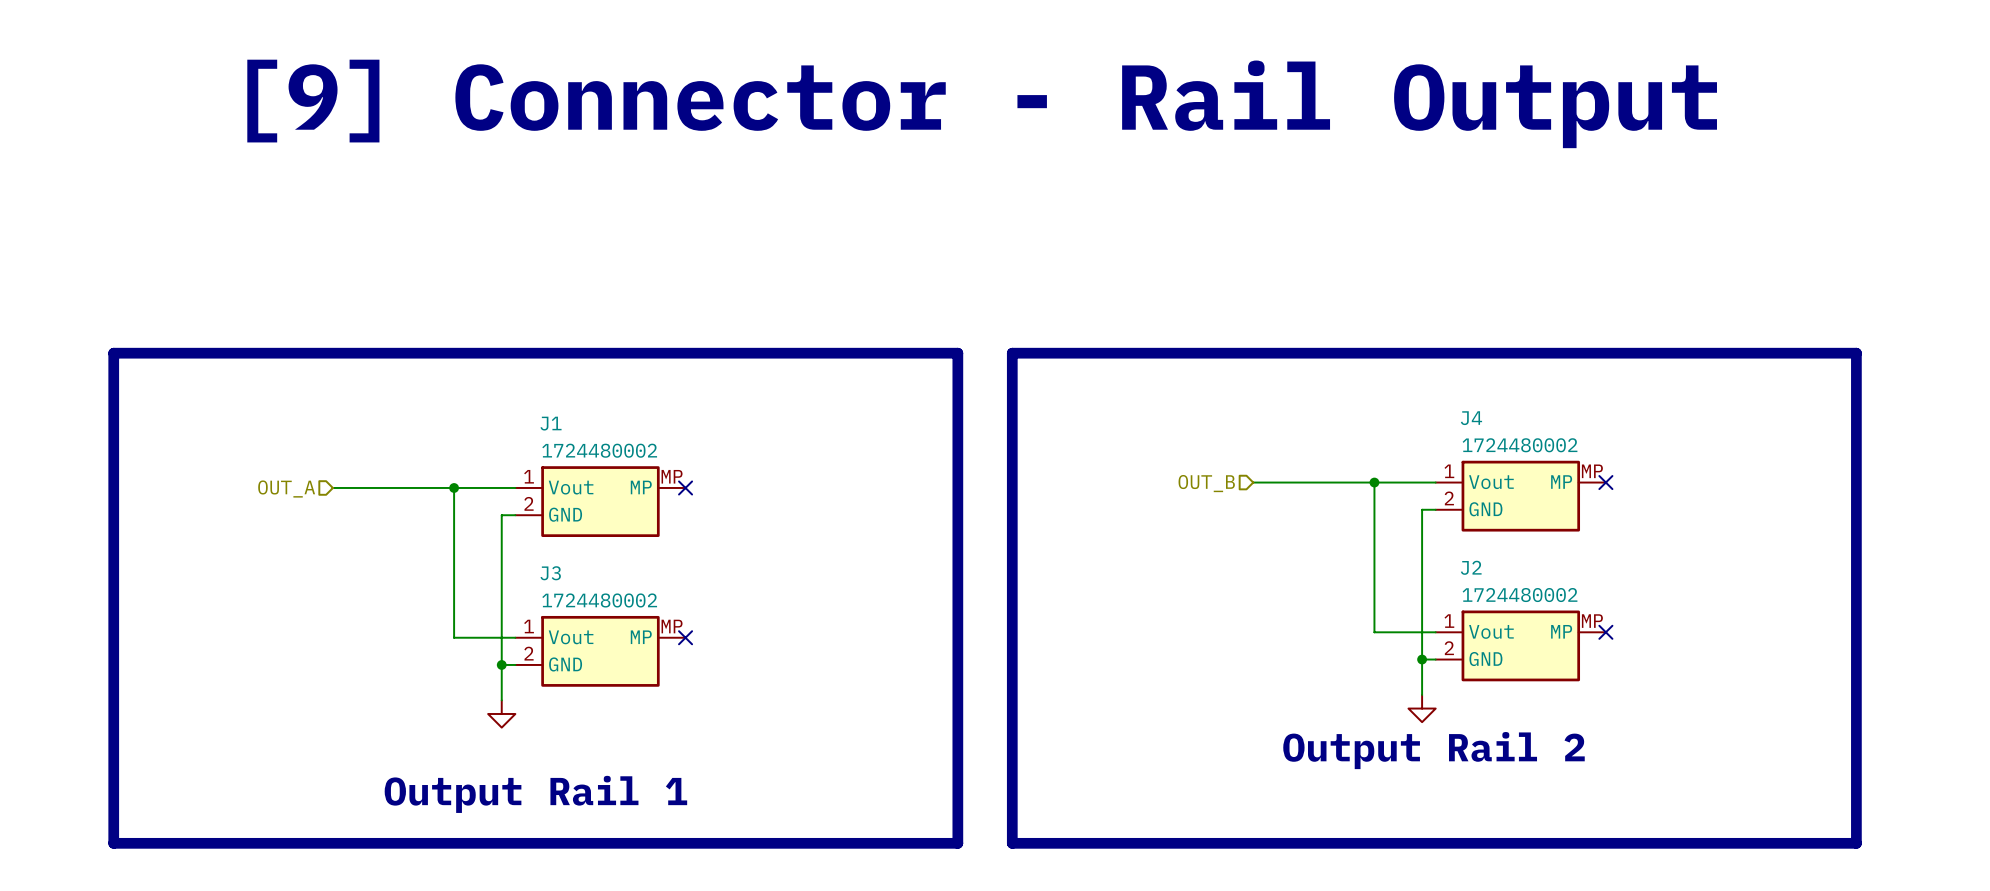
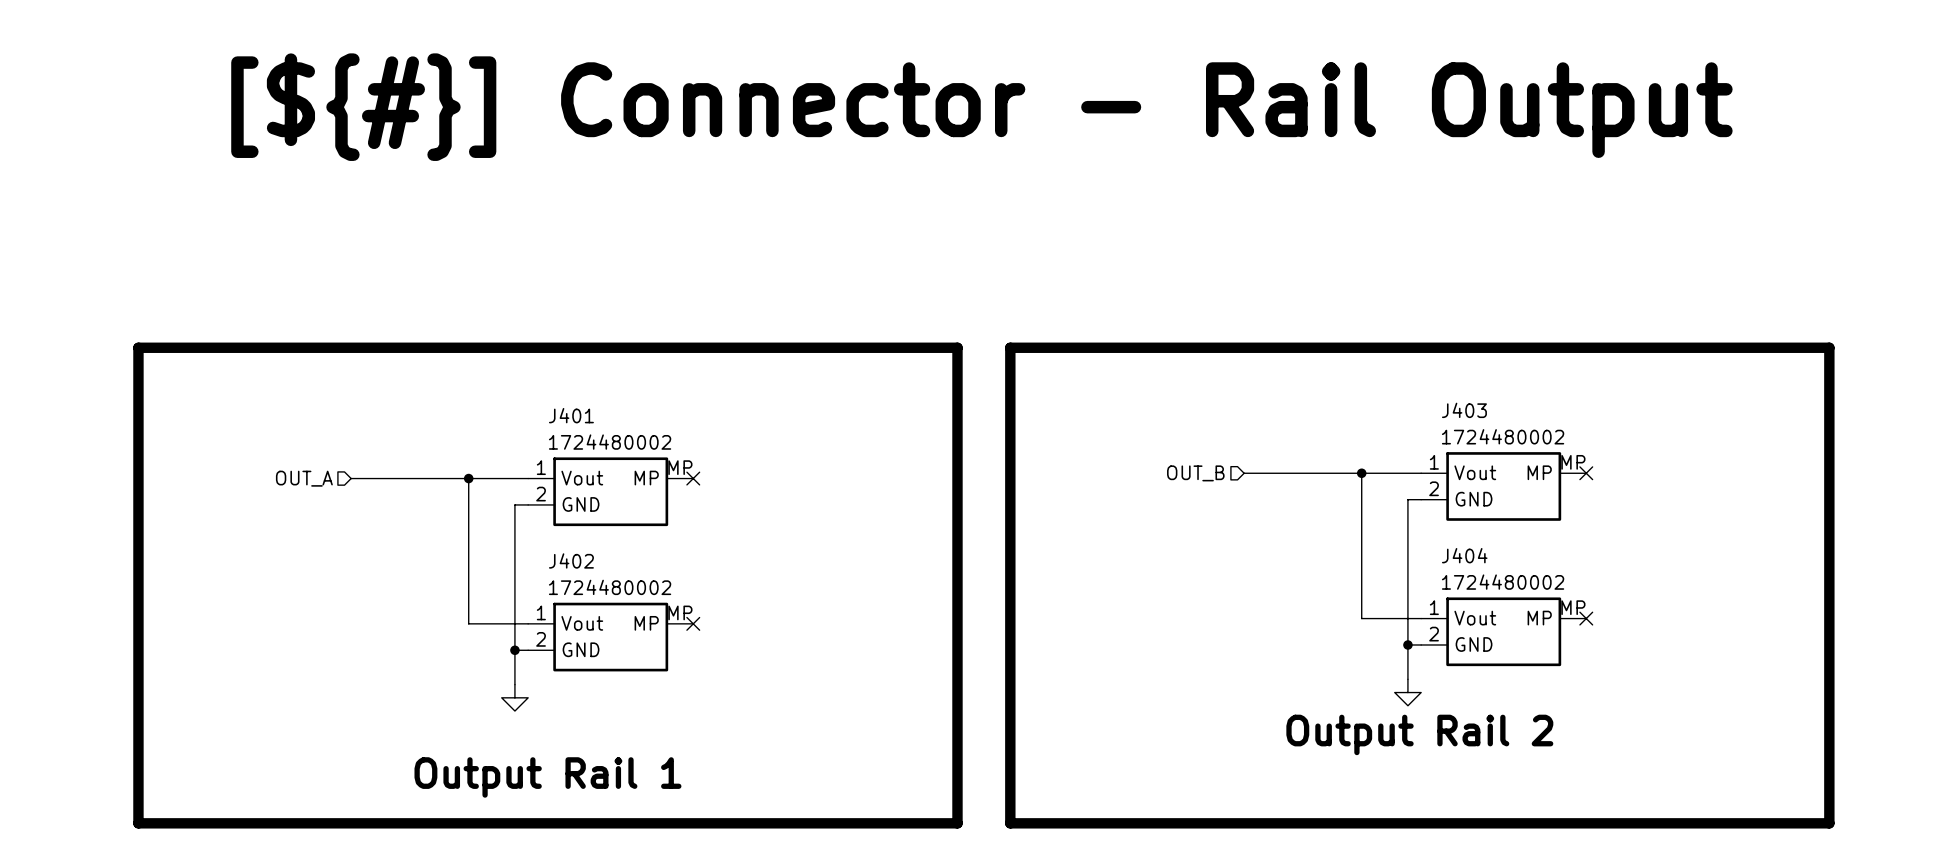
text: [9] Connector - Rail Output (982, 103) -> [${#}] Connector - Rail Output (981, 107)
J4 name: J4 (1471, 418) -> J403 (1464, 410)
J1 name: J1 (551, 423) -> J401 (571, 415)
J2 name: J2 (1471, 567) -> J404 (1464, 555)
J3 name: J3 (550, 573) -> J402 (571, 560)

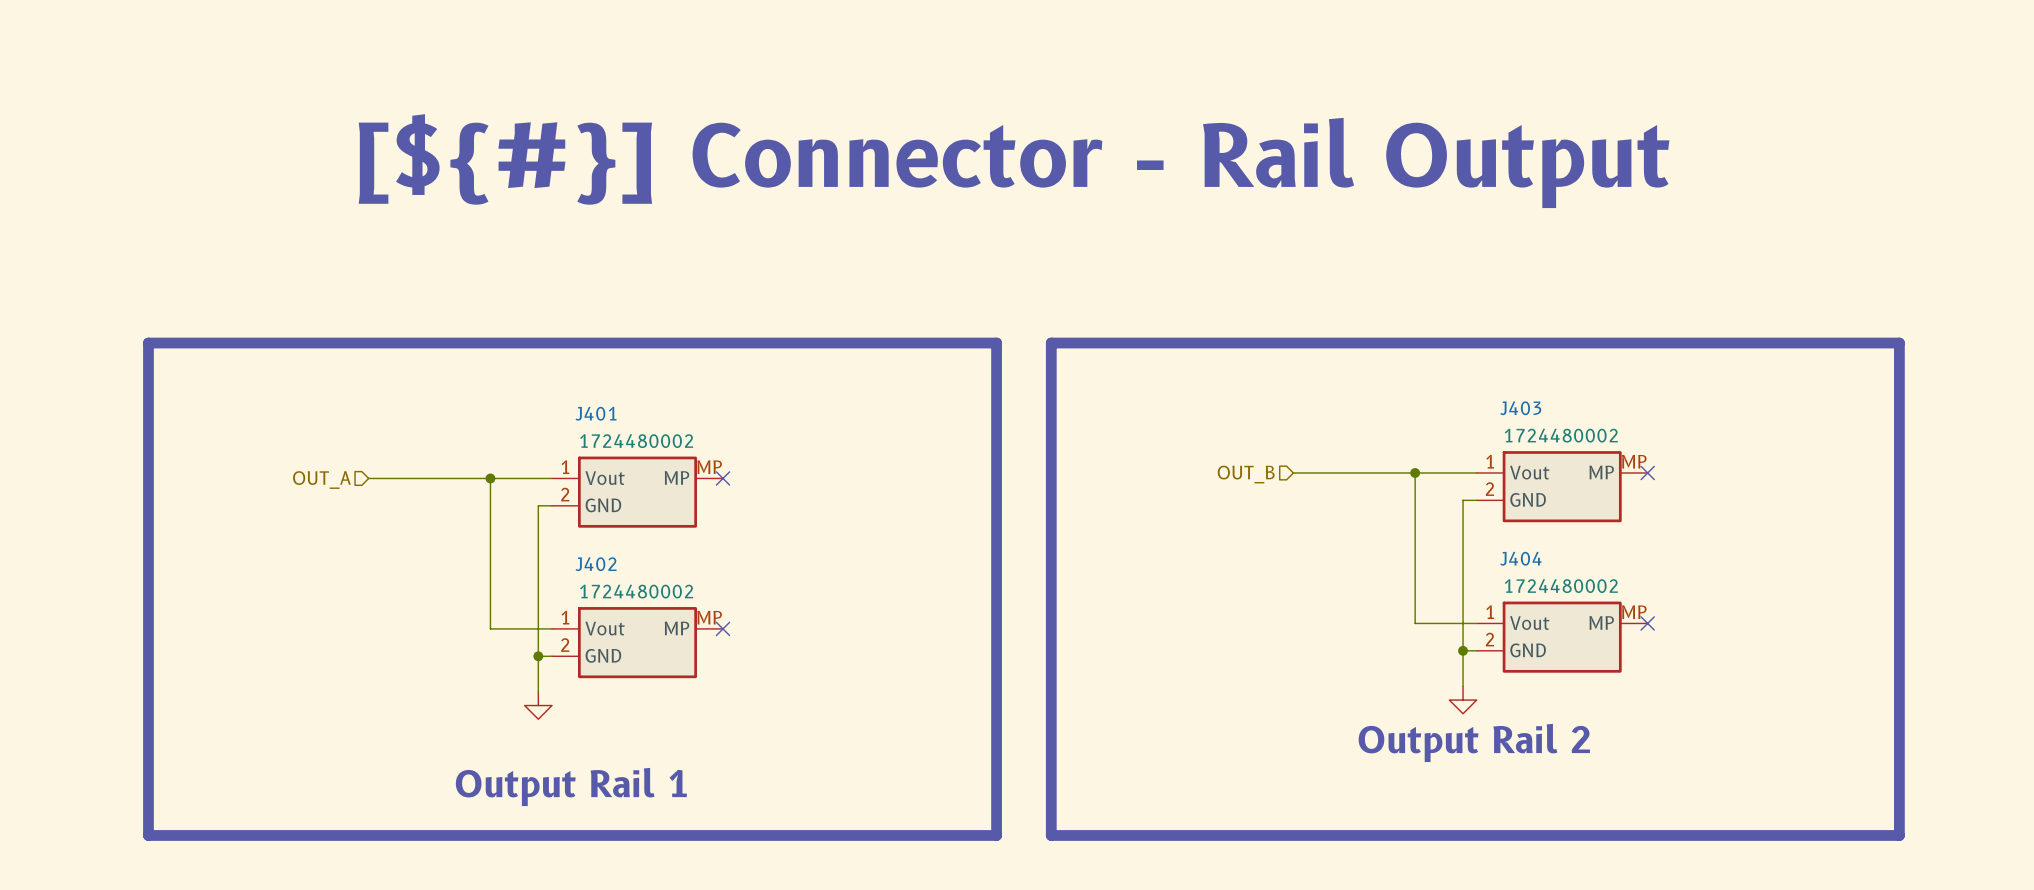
text position: [${#}] Connector - Rail Output (981, 107) -> [${#}] Connector - Rail Output (1014, 161)

